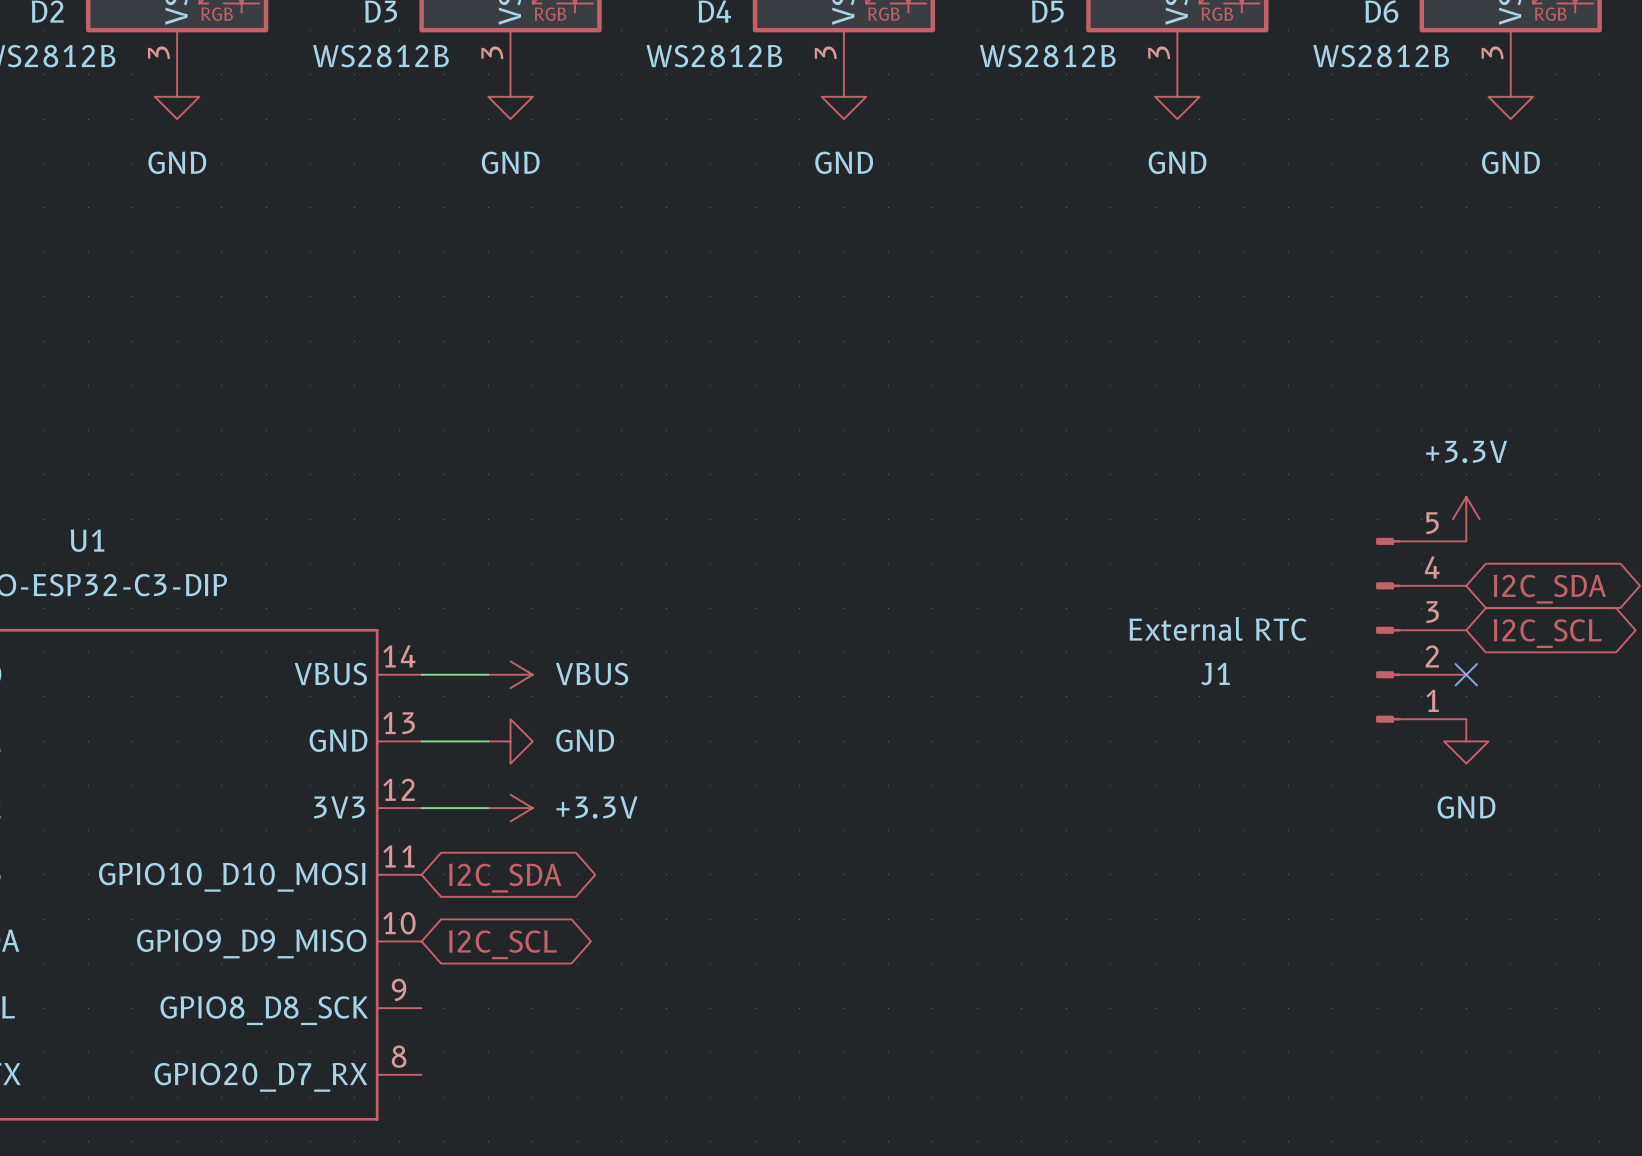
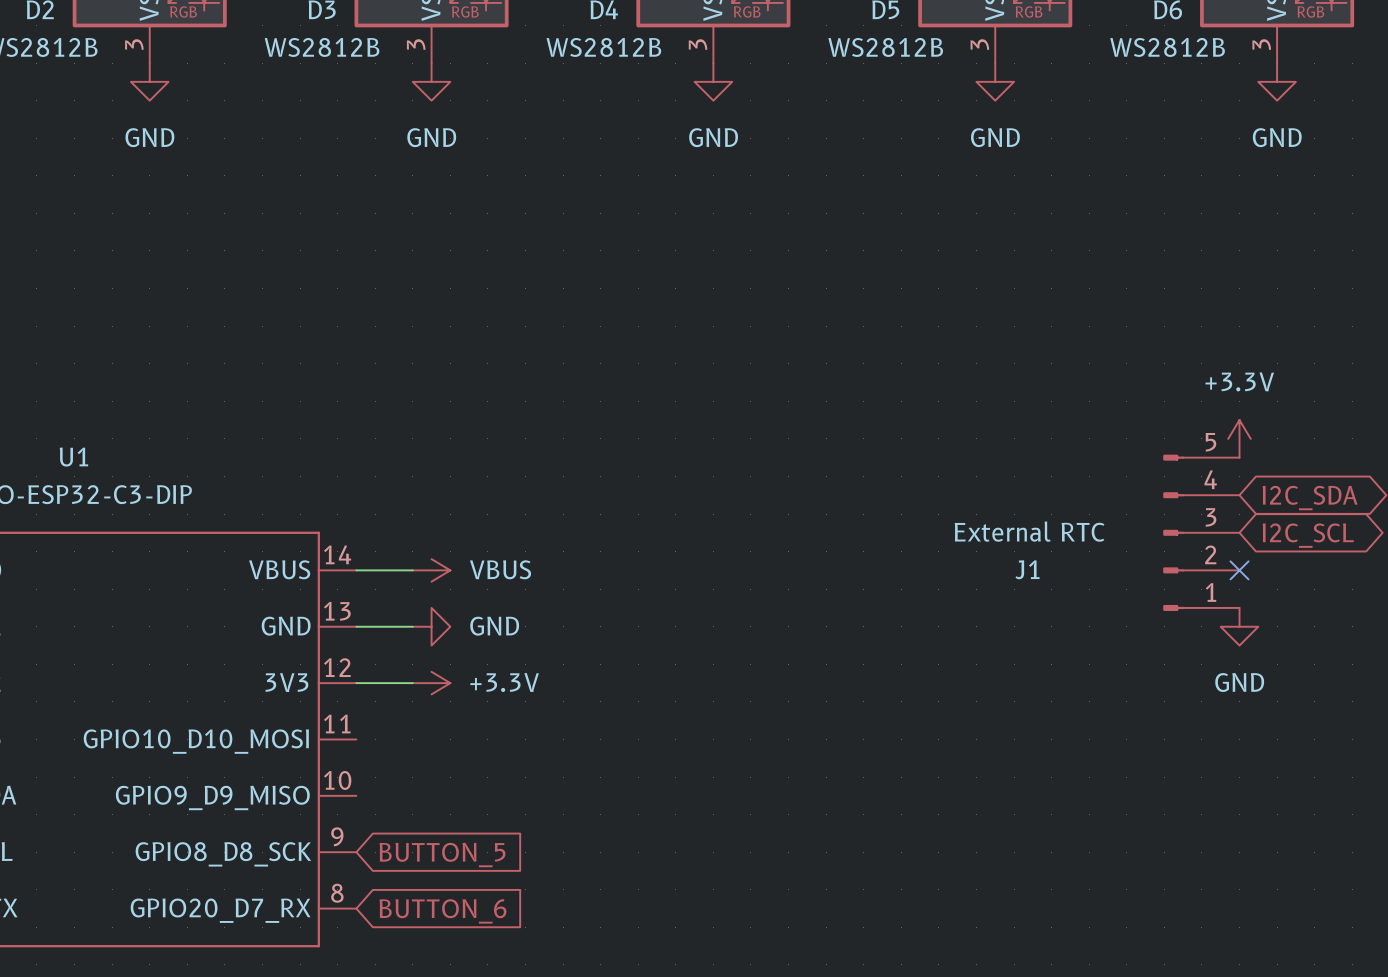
global label: I2C_SDA (505, 878) -> none
global label: I2C_SCL (502, 944) -> none
global label: none -> BUTTON_5 (442, 855)
global label: none -> BUTTON_6 (442, 911)

